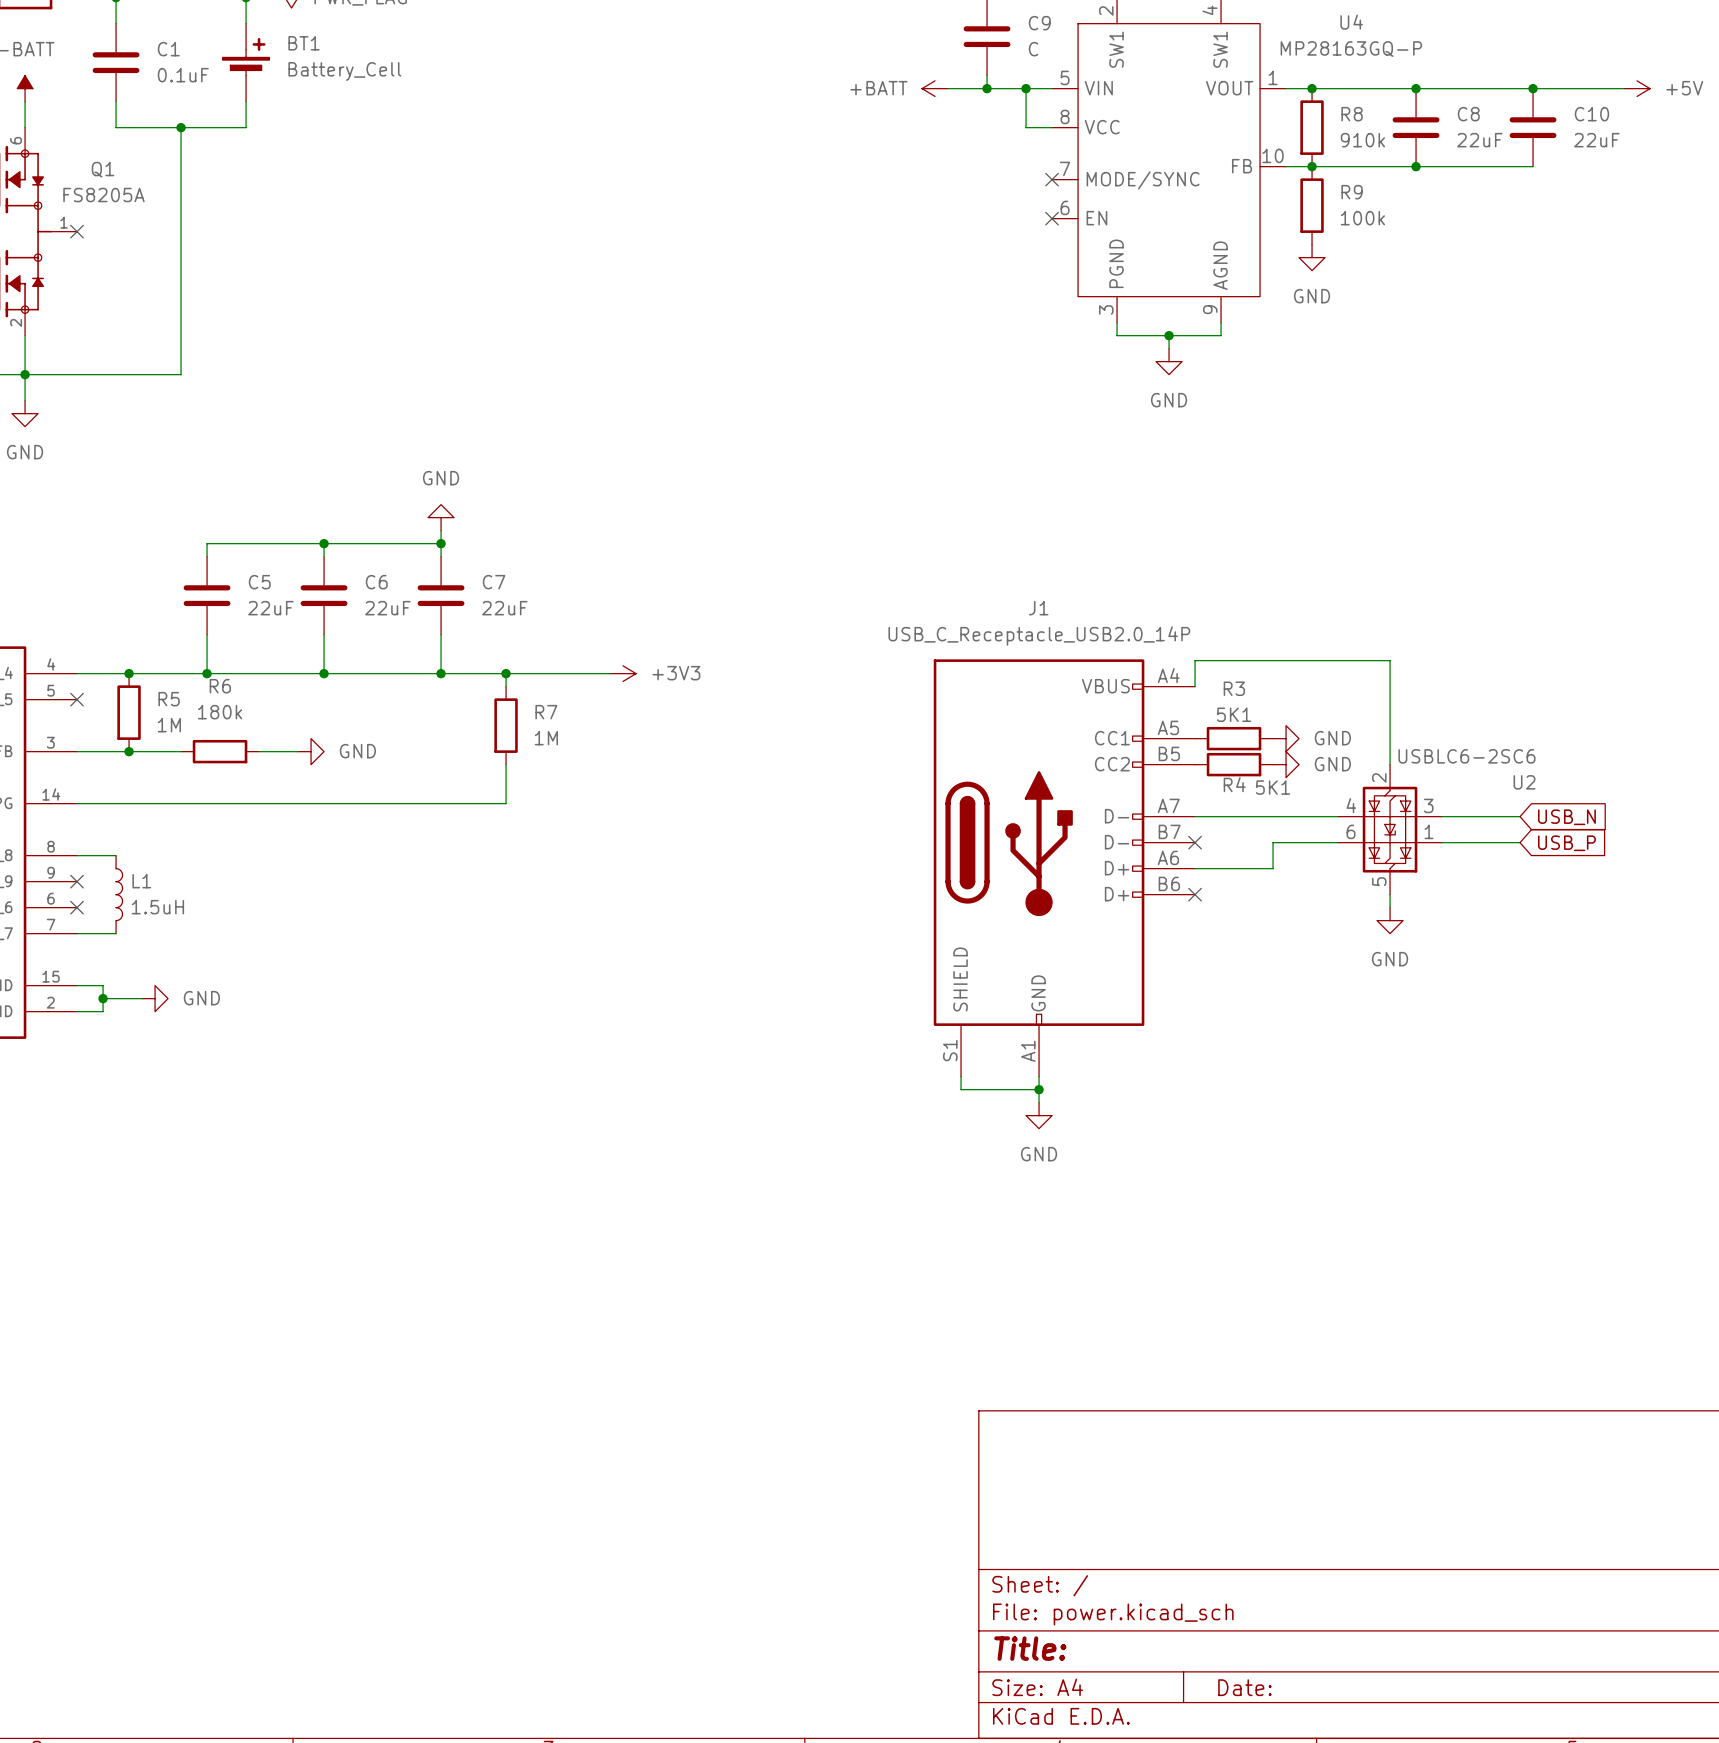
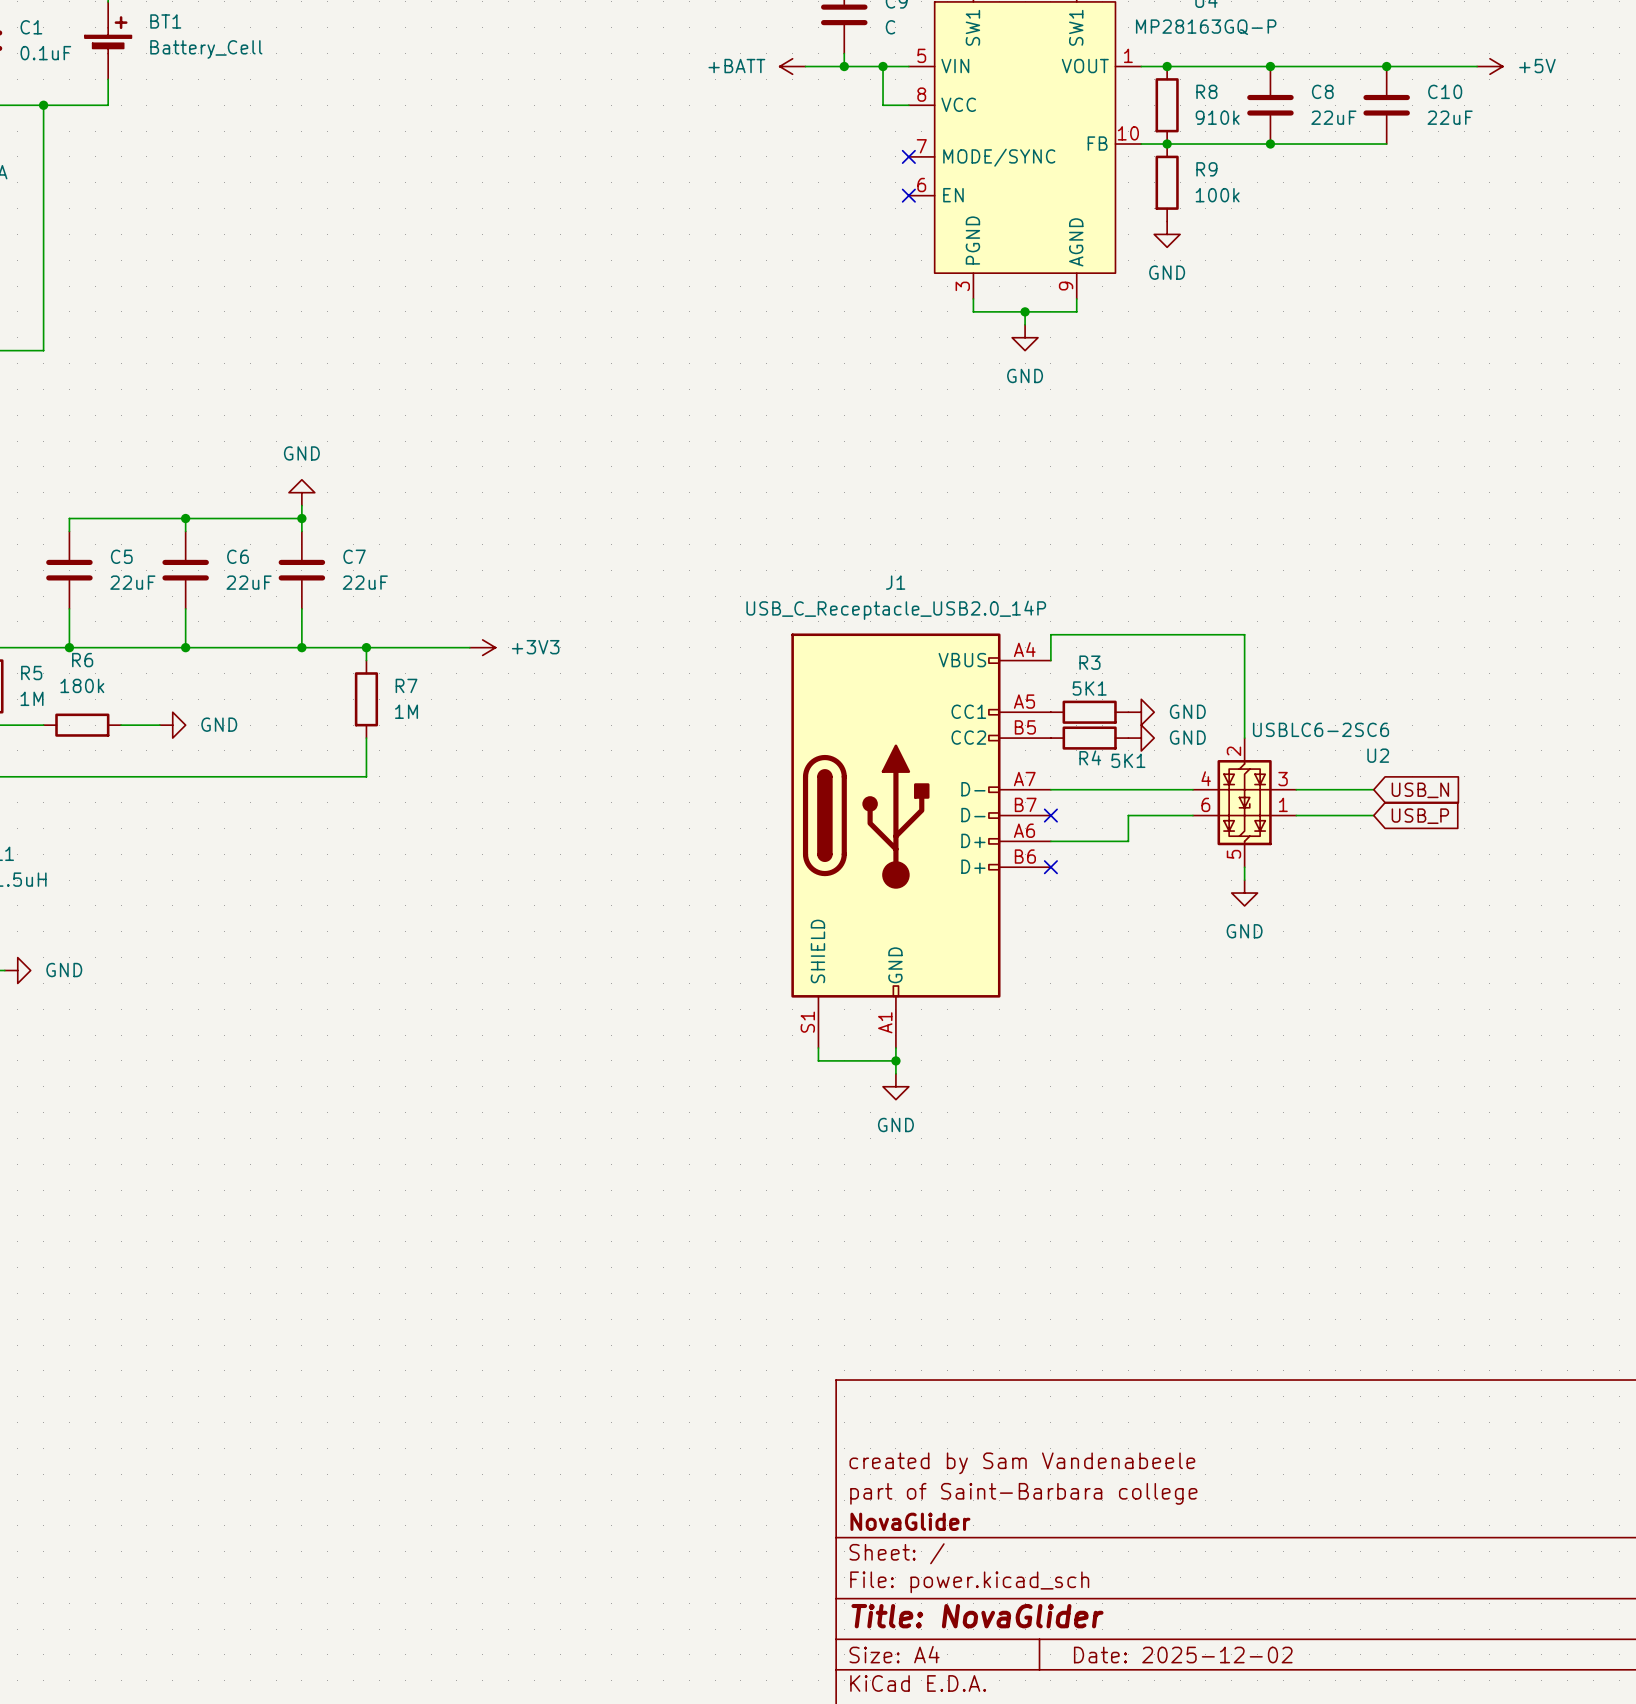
title block: none -> created by Sam Vandenabeele (1022, 1463)
title block: none -> part of Saint-Barbara college (1023, 1493)
title block: none -> NovaGlider (910, 1521)
title block: Title: (1030, 1648) -> Title: NovaGlider (977, 1616)
title block: Date: (1244, 1687) -> Date: 2025-12-02 (1183, 1655)

